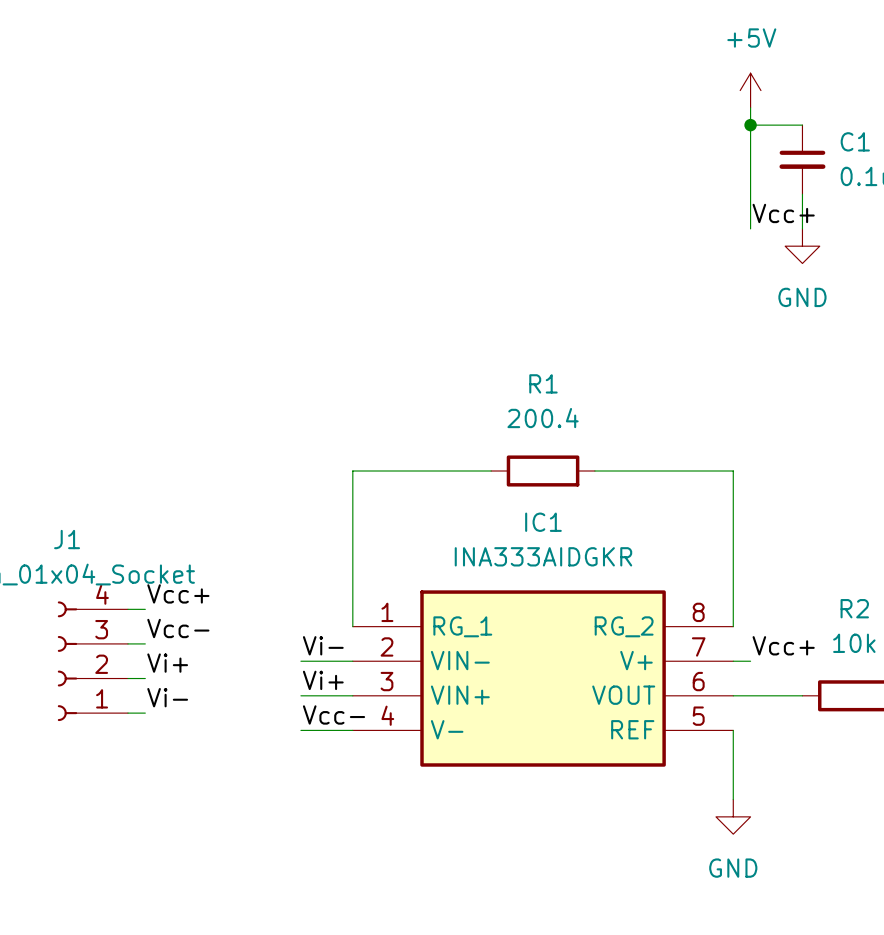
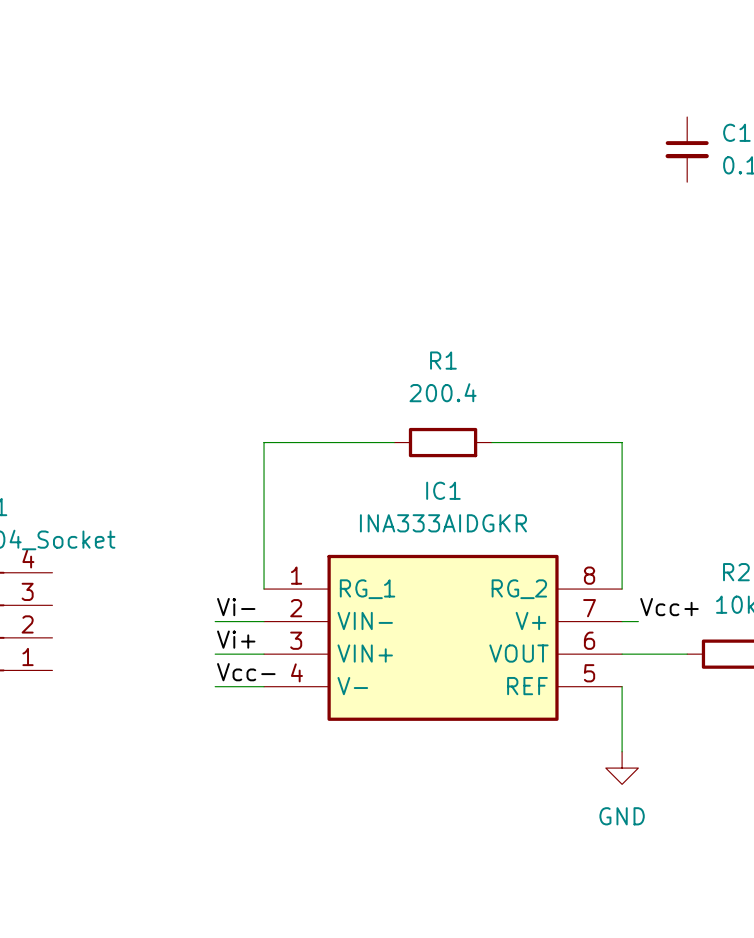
power symbol: +5V (750, 90) -> none
wire: (750, 107) (750, 228) -> none
wire: (750, 125) (802, 125) -> none
junction: (750, 125) -> none
wire: (802, 194) (802, 228) -> none
label: Vcc+ (783, 213) -> none
power symbol: GND (802, 246) -> none
label: Vcc+ (178, 593) -> none
wire: (128, 609) (145, 609) -> none
label: Vcc- (178, 628) -> none
wire: (128, 643) (145, 643) -> none
label: Vi+ (167, 663) -> none
wire: (128, 678) (145, 678) -> none
label: Vi- (167, 697) -> none
wire: (128, 713) (145, 713) -> none

